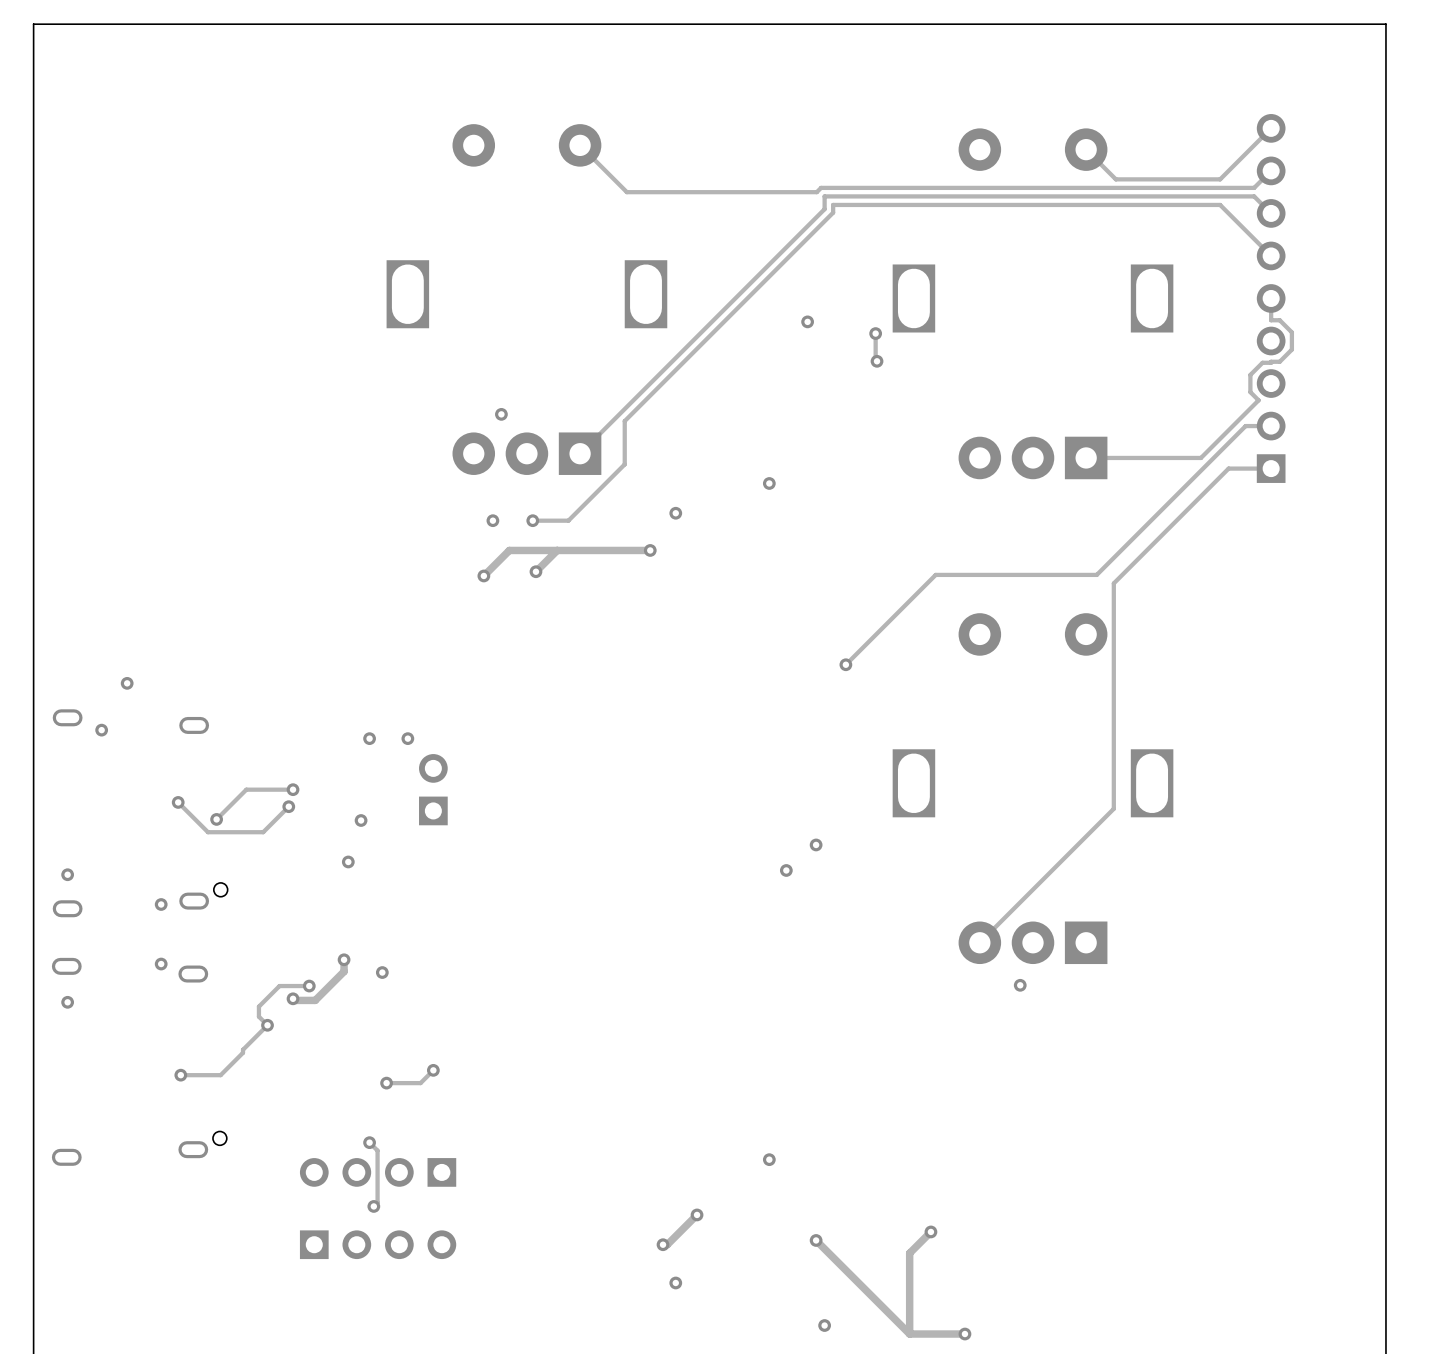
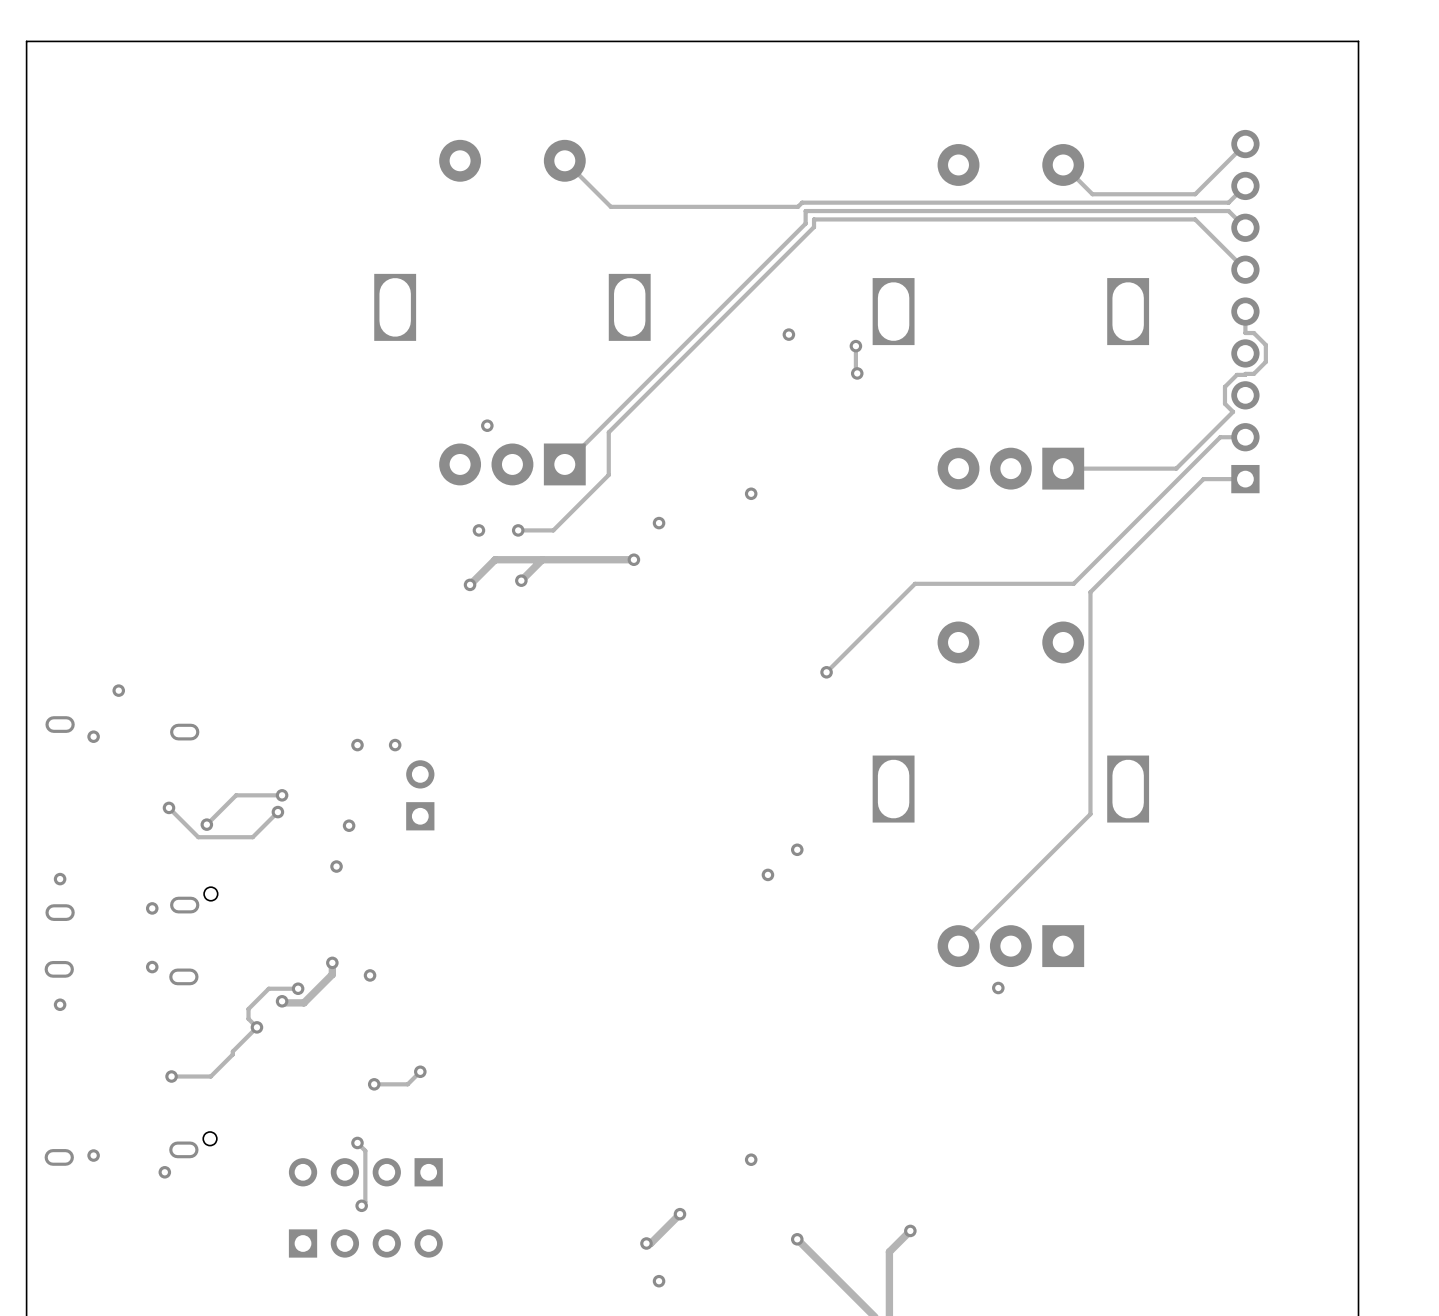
via: none -> (93, 1155)
via: none -> (164, 1172)

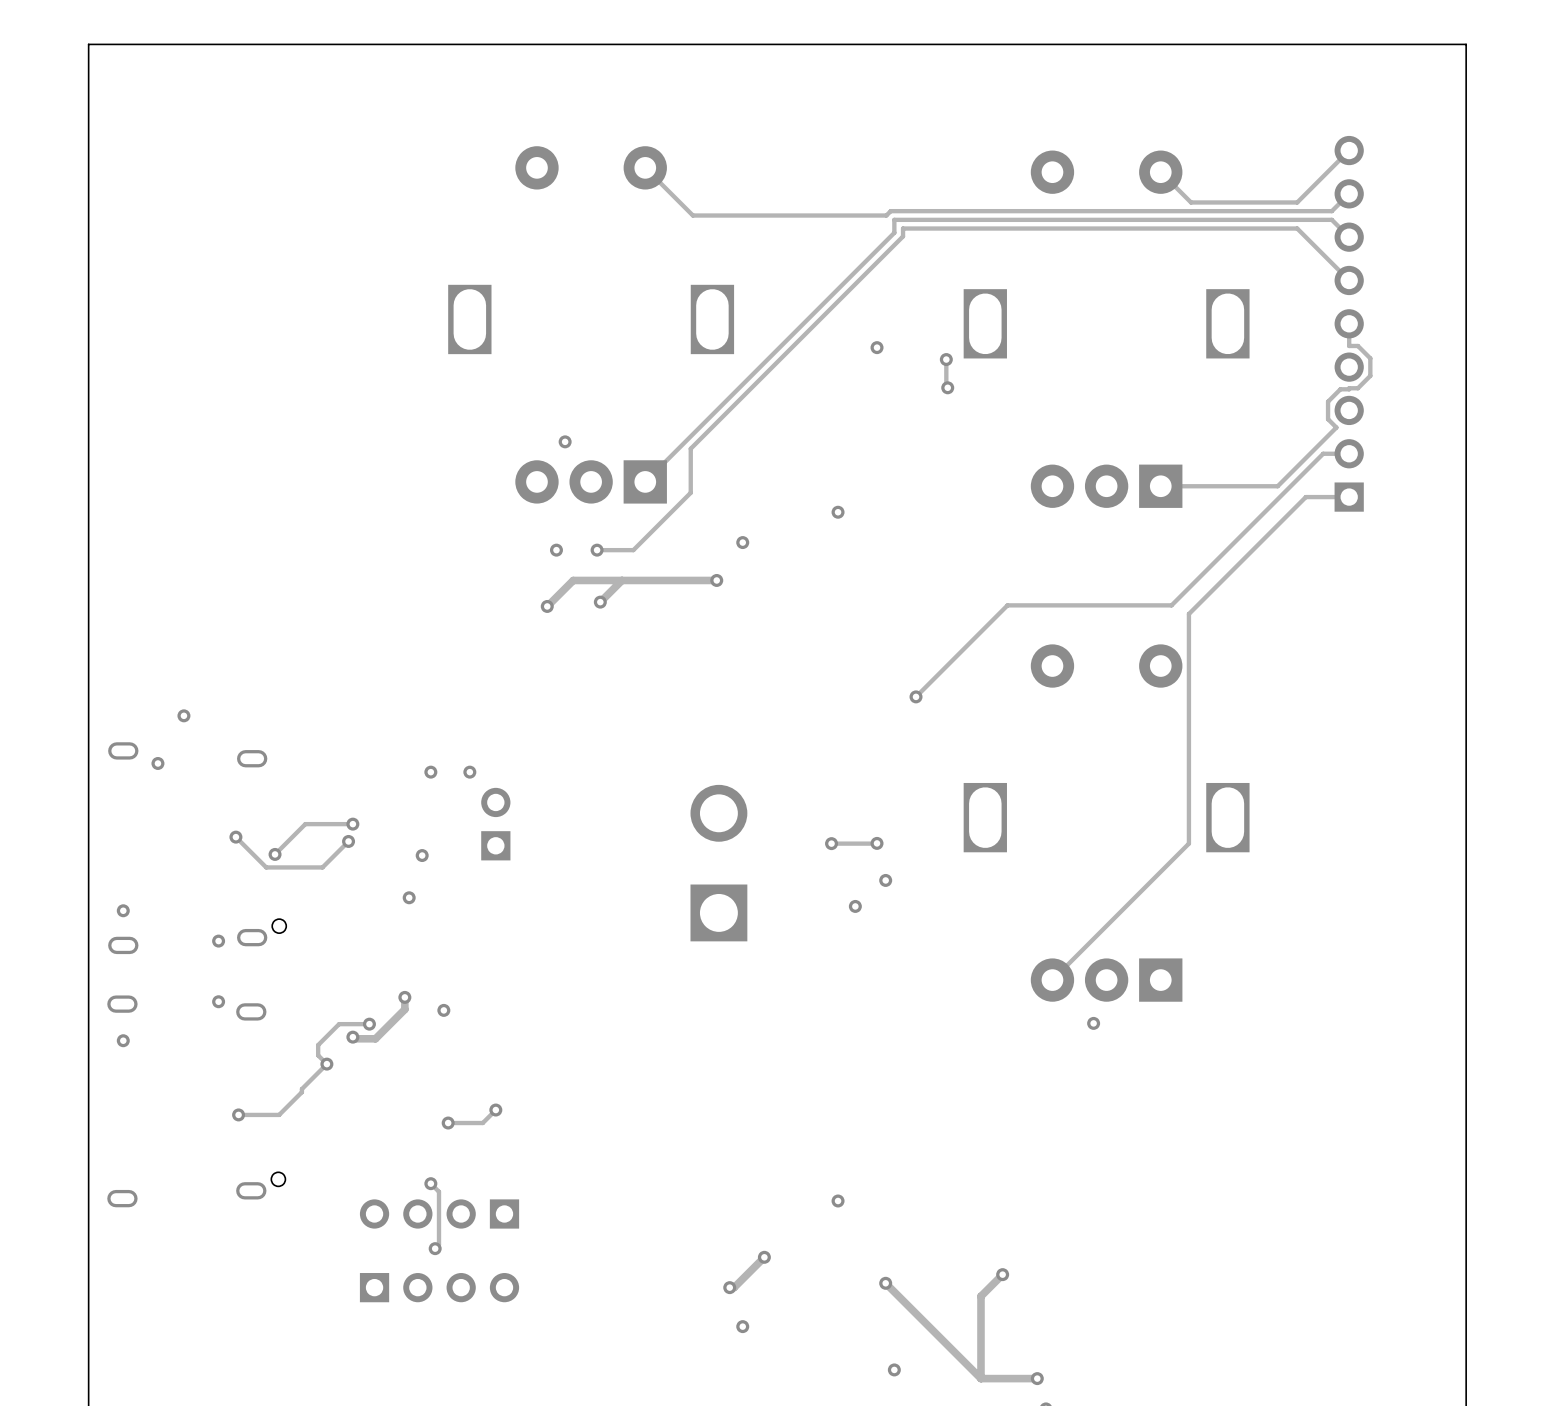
via: none -> (877, 843)
via: none -> (831, 843)
track: none -> (877, 843) (831, 843)
part: none -> (718, 863)
via: (93, 1155) -> none
via: (164, 1172) -> none

